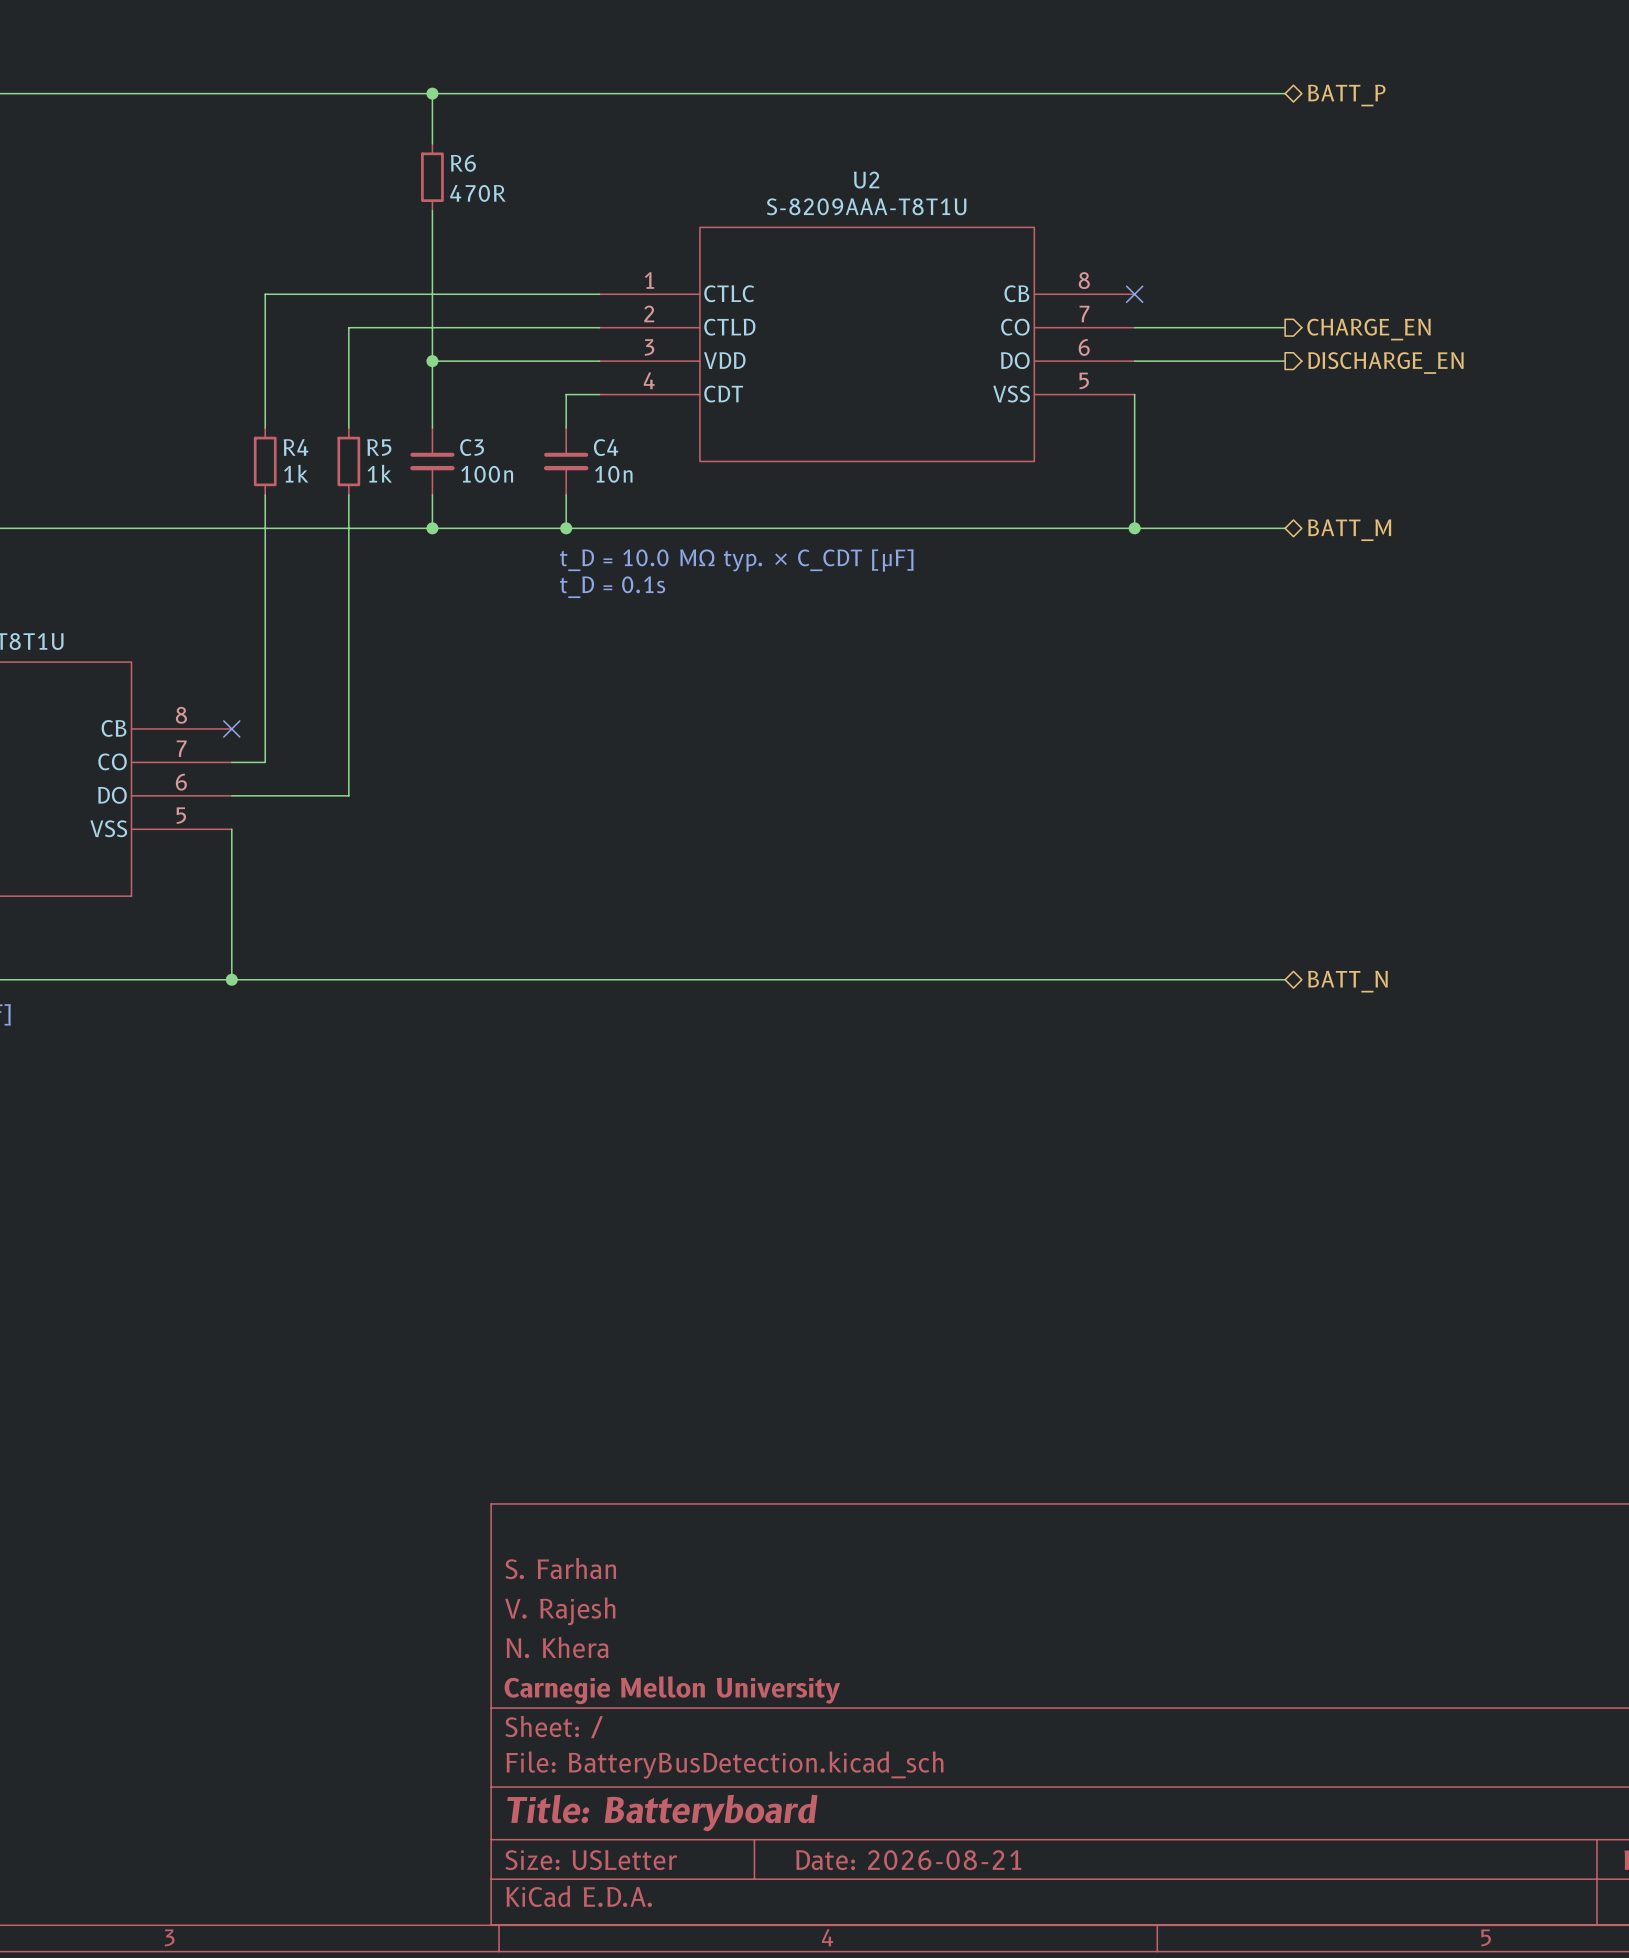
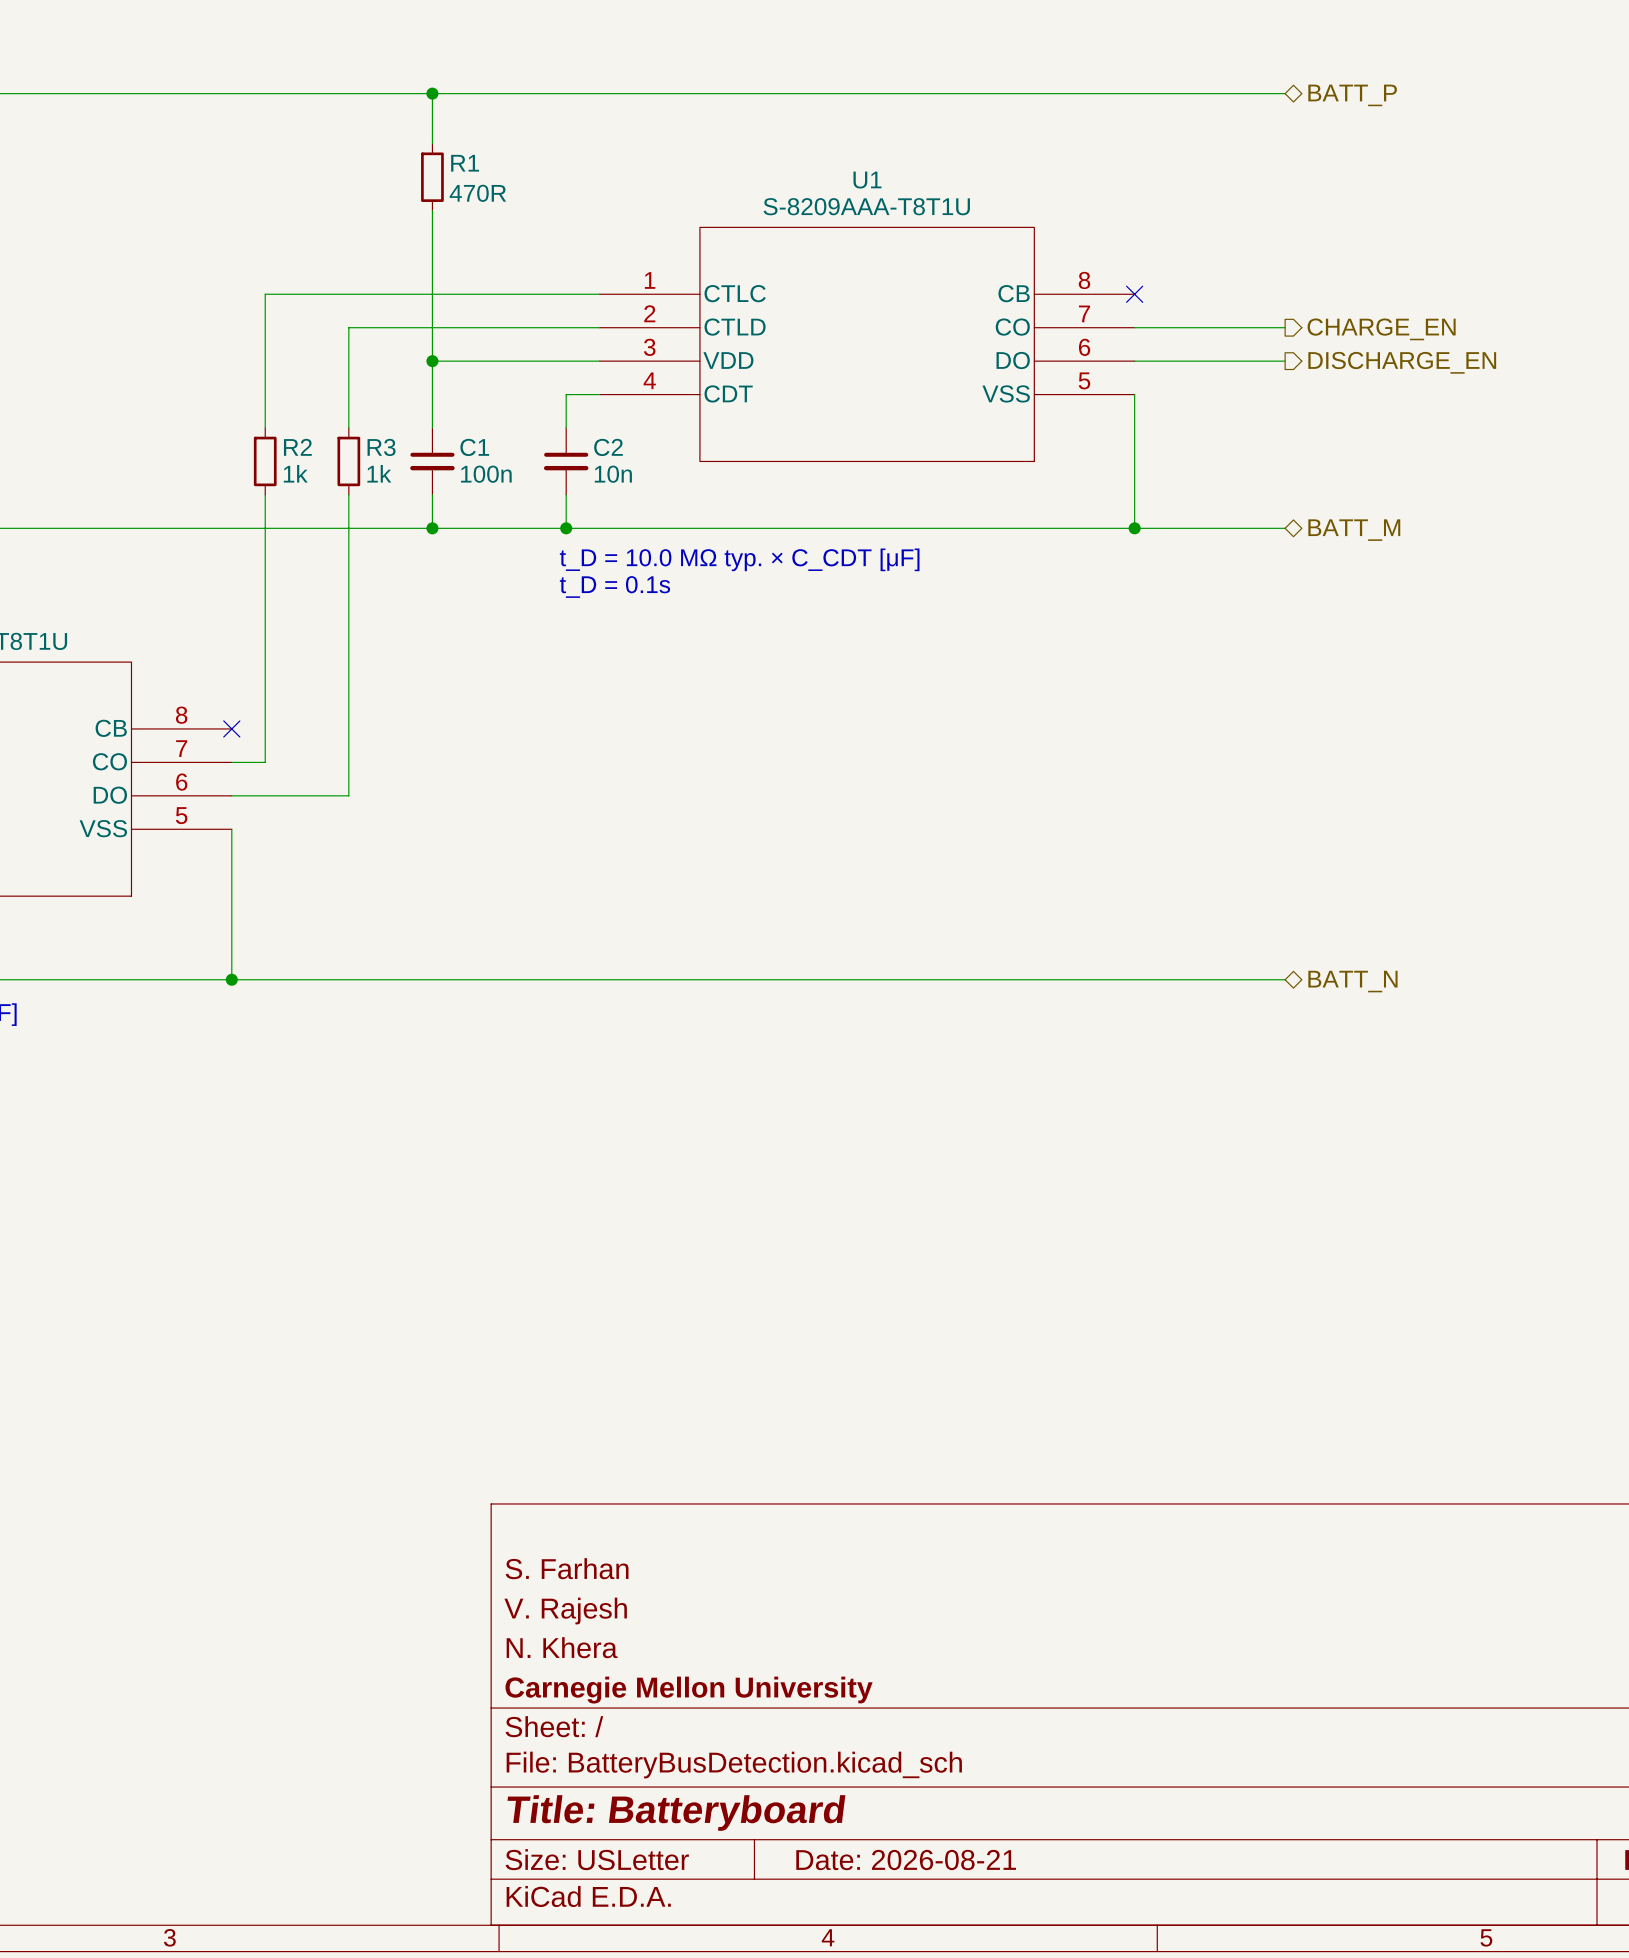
R6 name: R6 (463, 163) -> R1 (465, 163)
U2 name: U2 (866, 180) -> U1 (867, 180)
R4 name: R4 (296, 447) -> R2 (297, 447)
R5 name: R5 (379, 447) -> R3 (381, 447)
C3 name: C3 (472, 447) -> C1 (474, 447)
C4 name: C4 (606, 447) -> C2 (608, 447)

